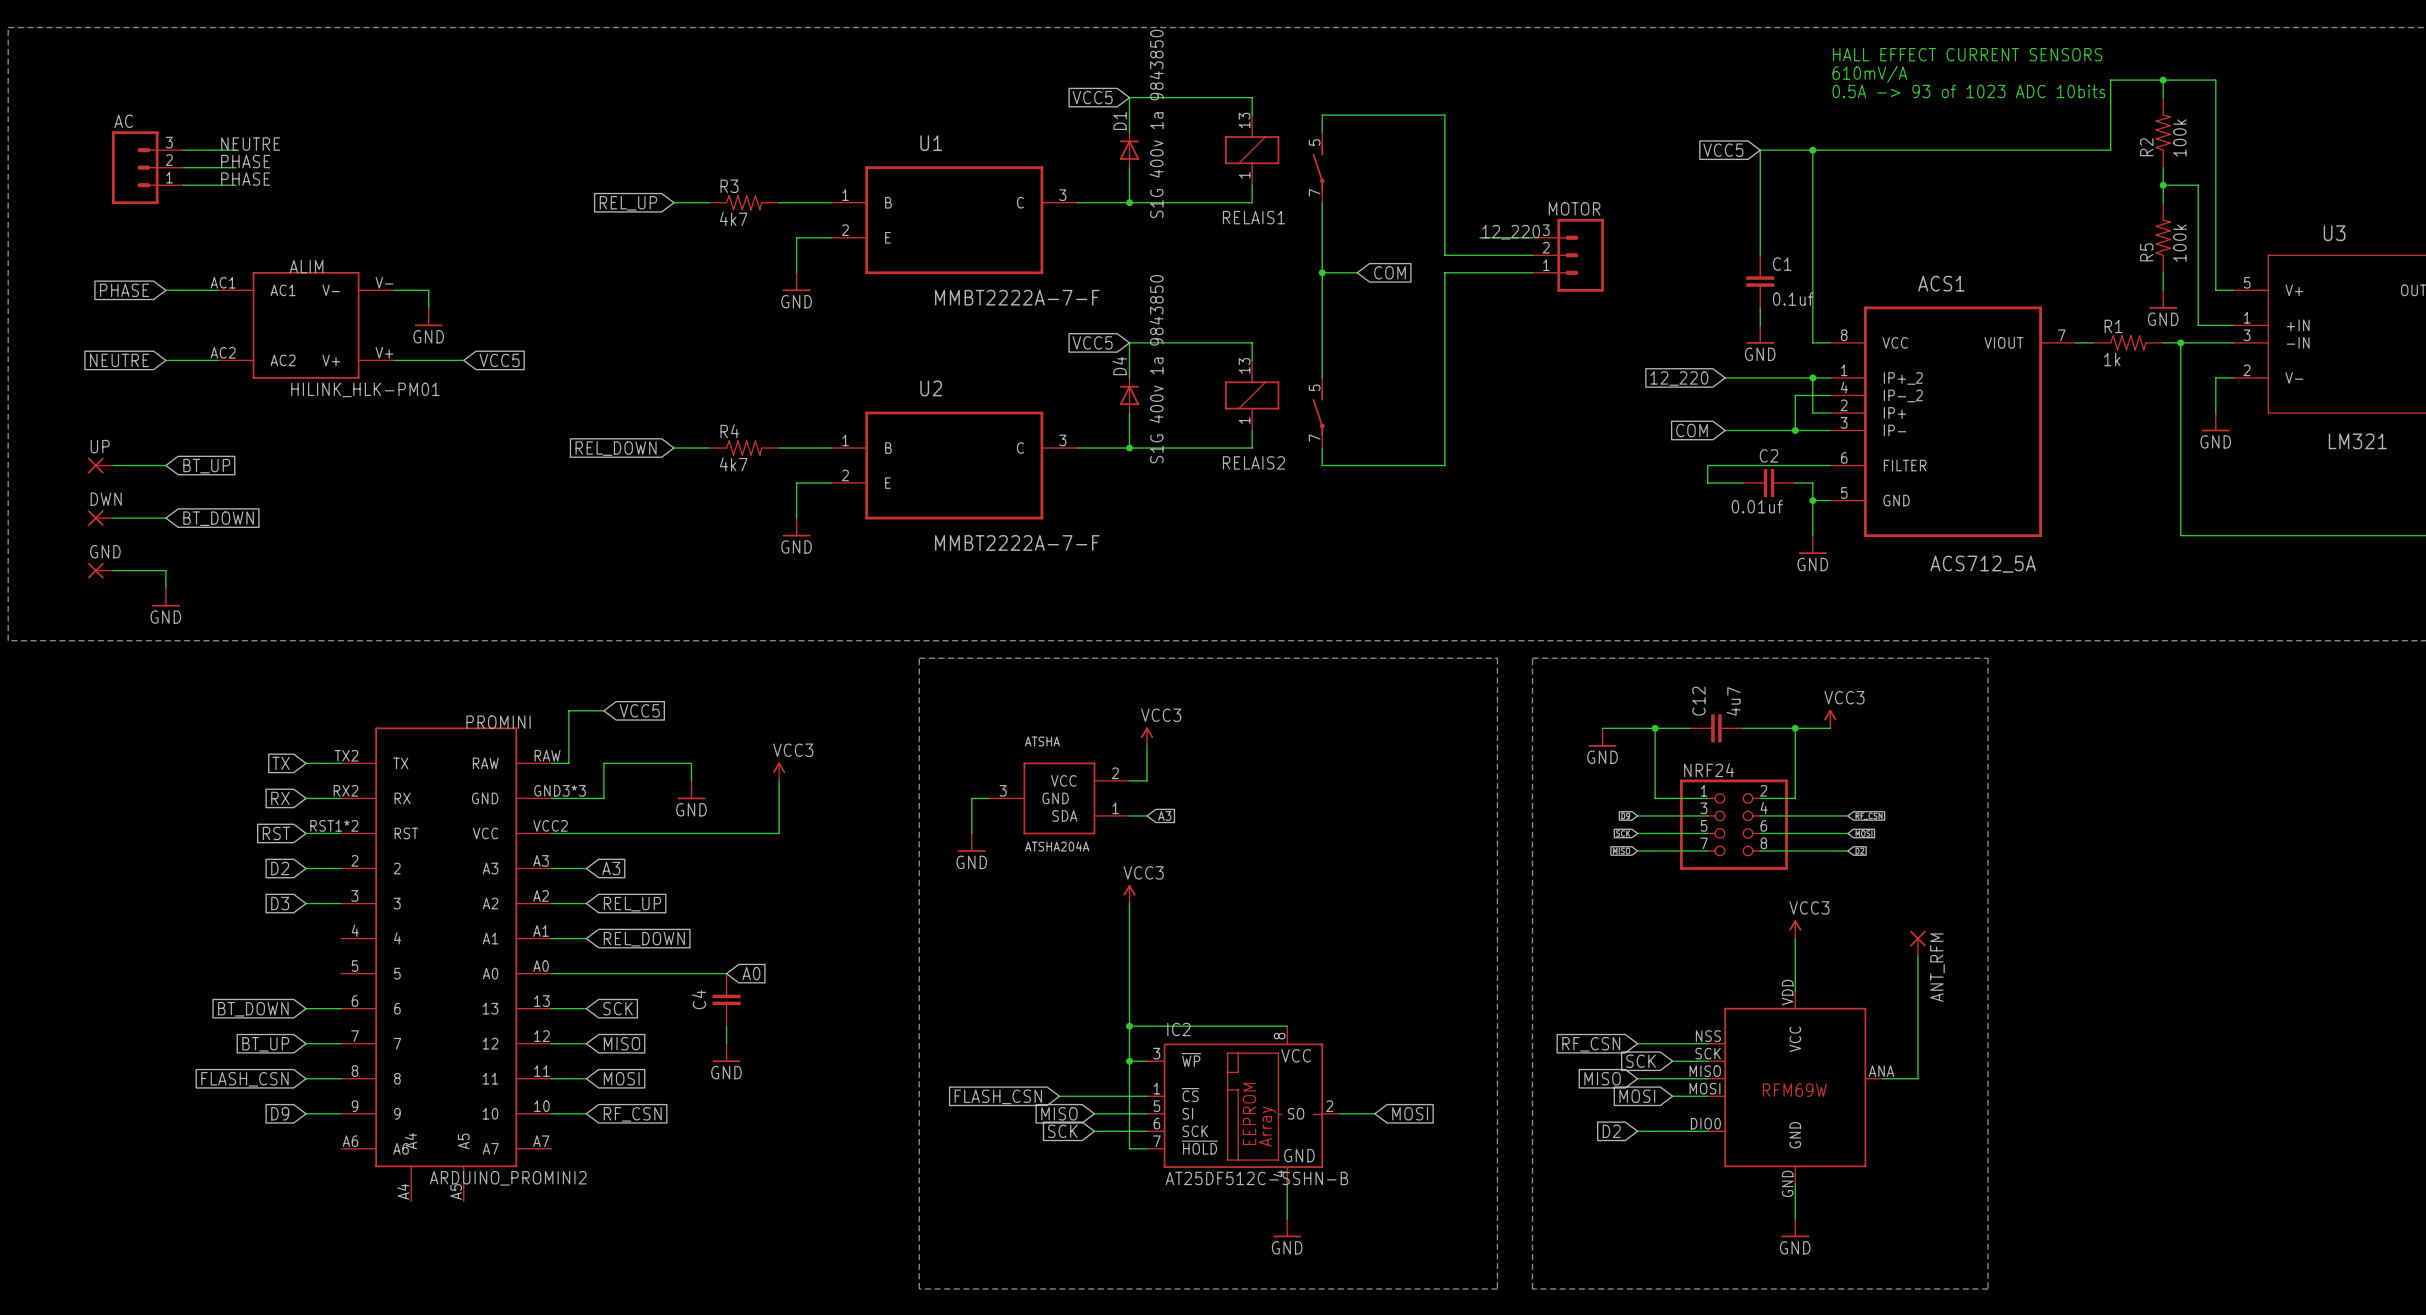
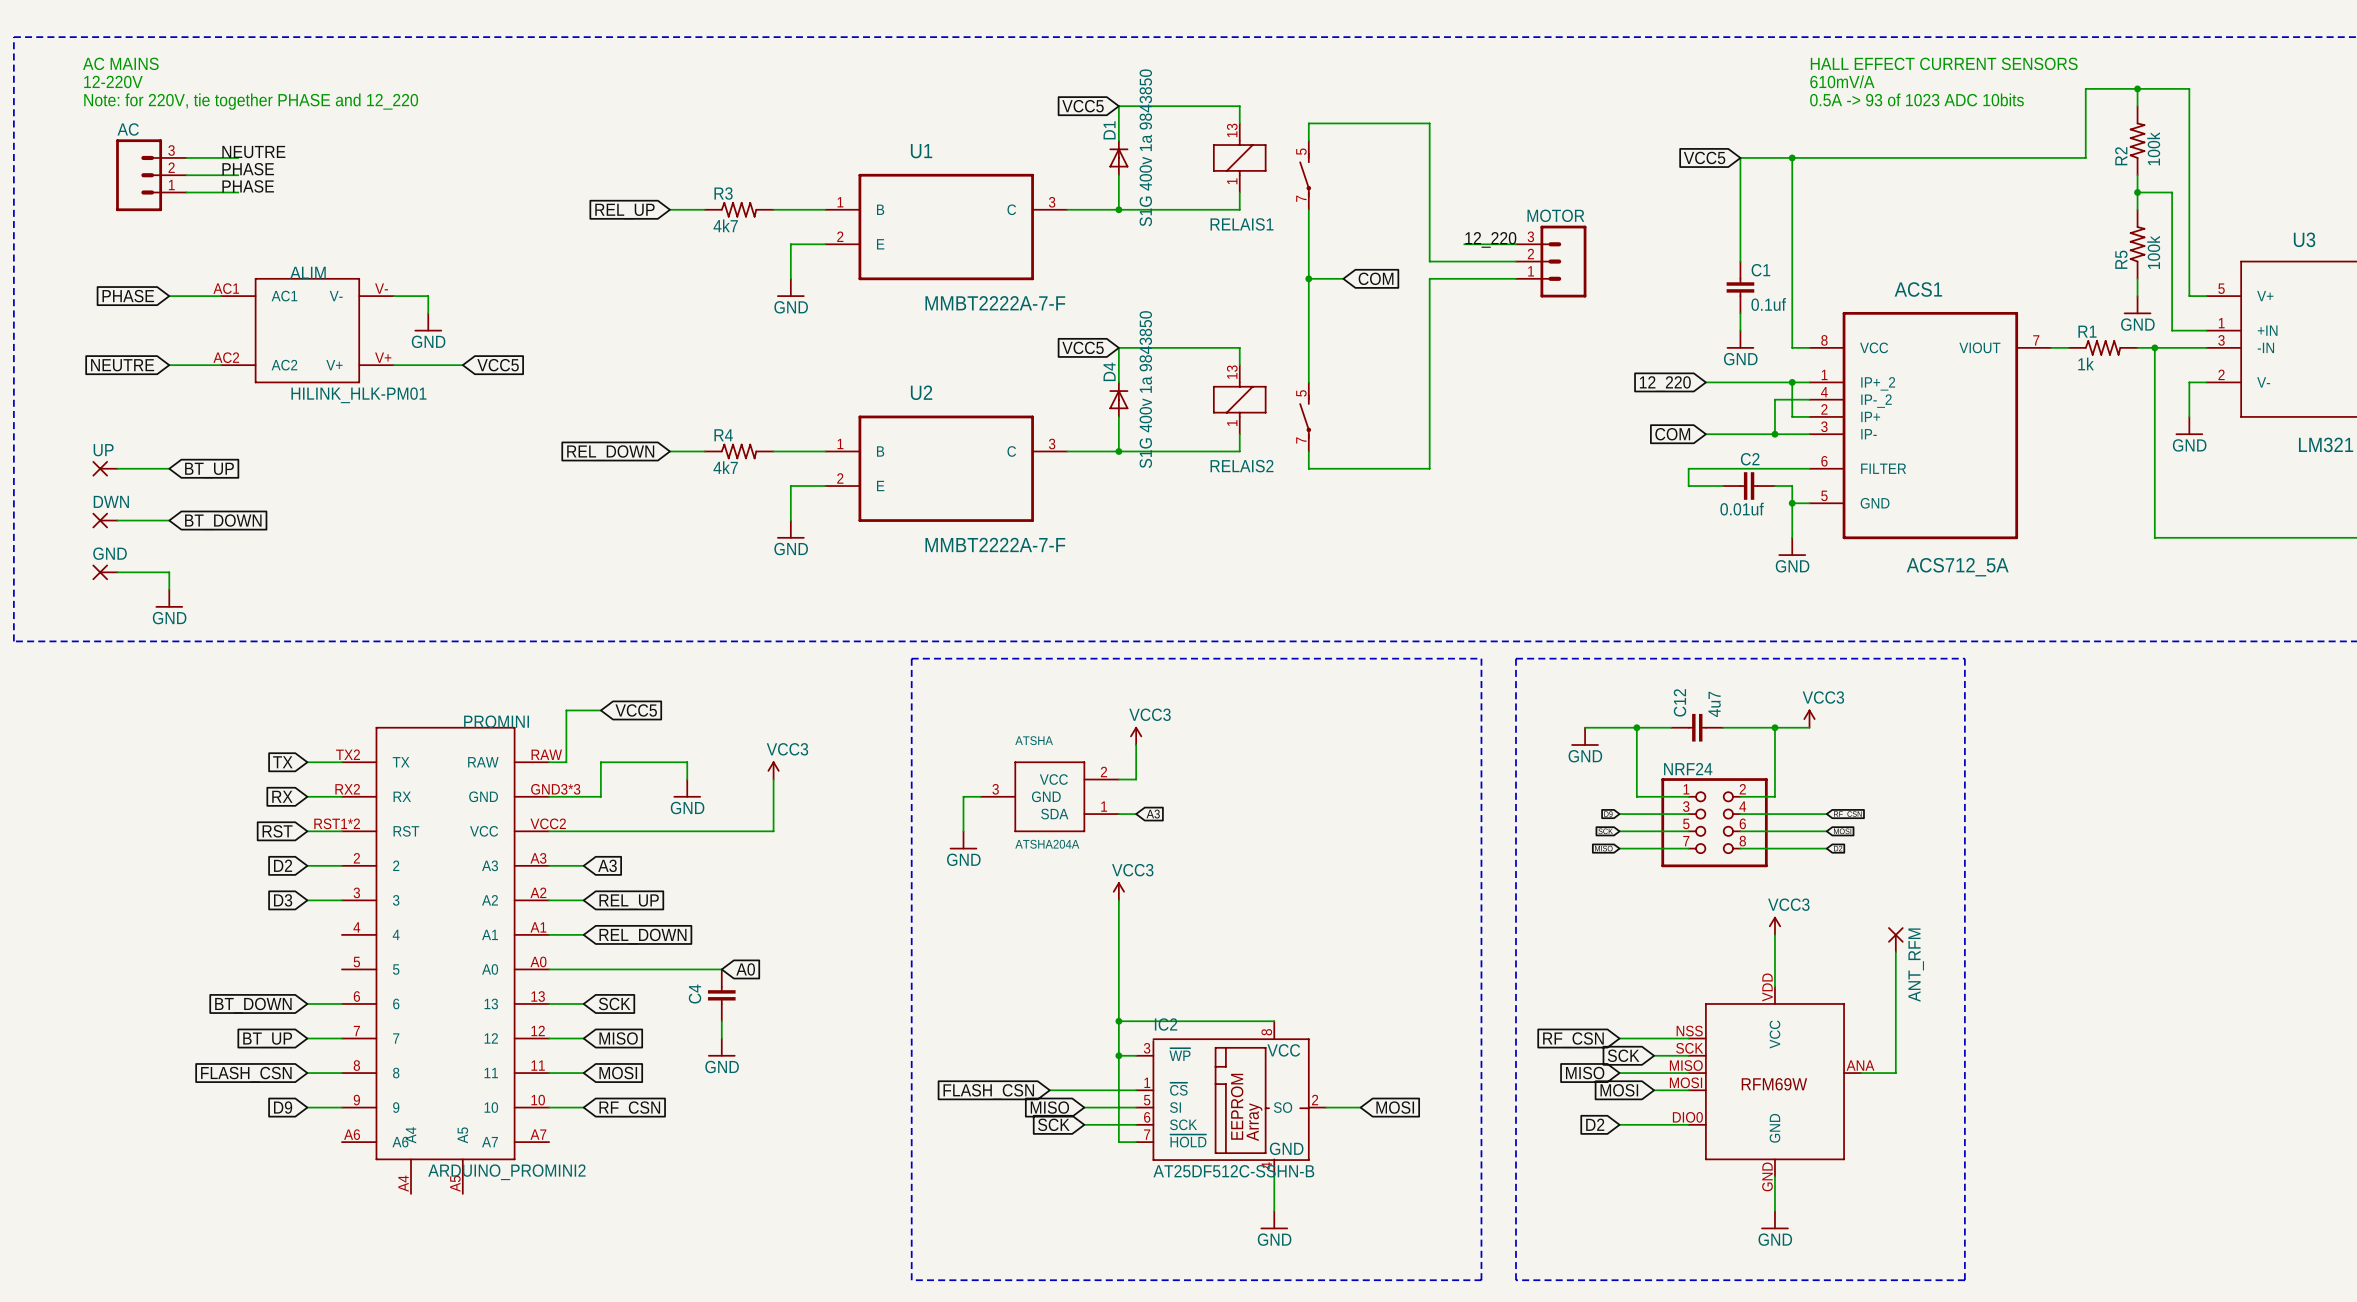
text: none -> AC MAINS (120, 63)
text: none -> 12-220V (113, 82)
text: none -> Note: for 220V, tie together PHASE and 12_220 (251, 101)

